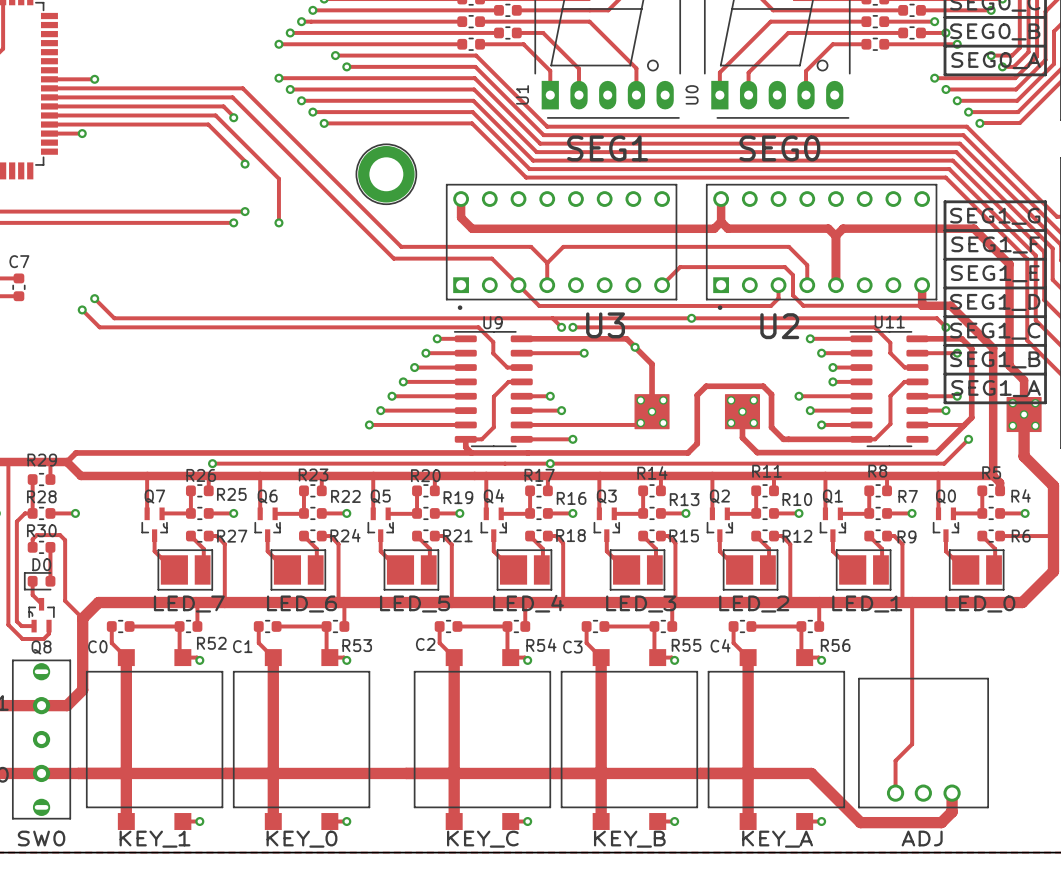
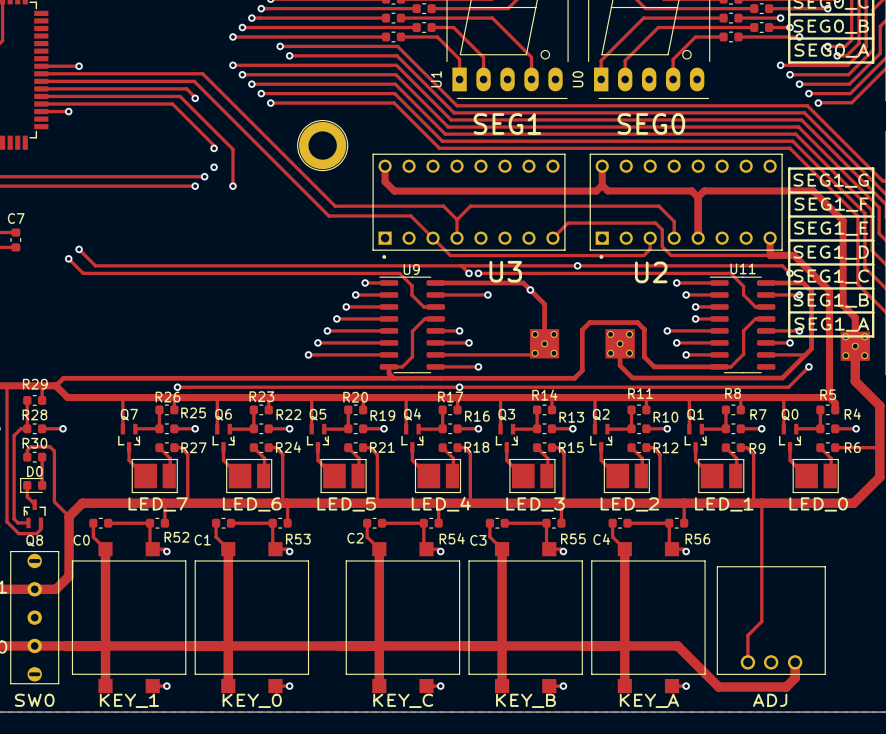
track: (206, 124) (245, 161) (245, 164) -> (172, 104) (214, 145) (214, 148)
via position: (245, 164) -> (214, 148)
via: none -> (214, 167)

